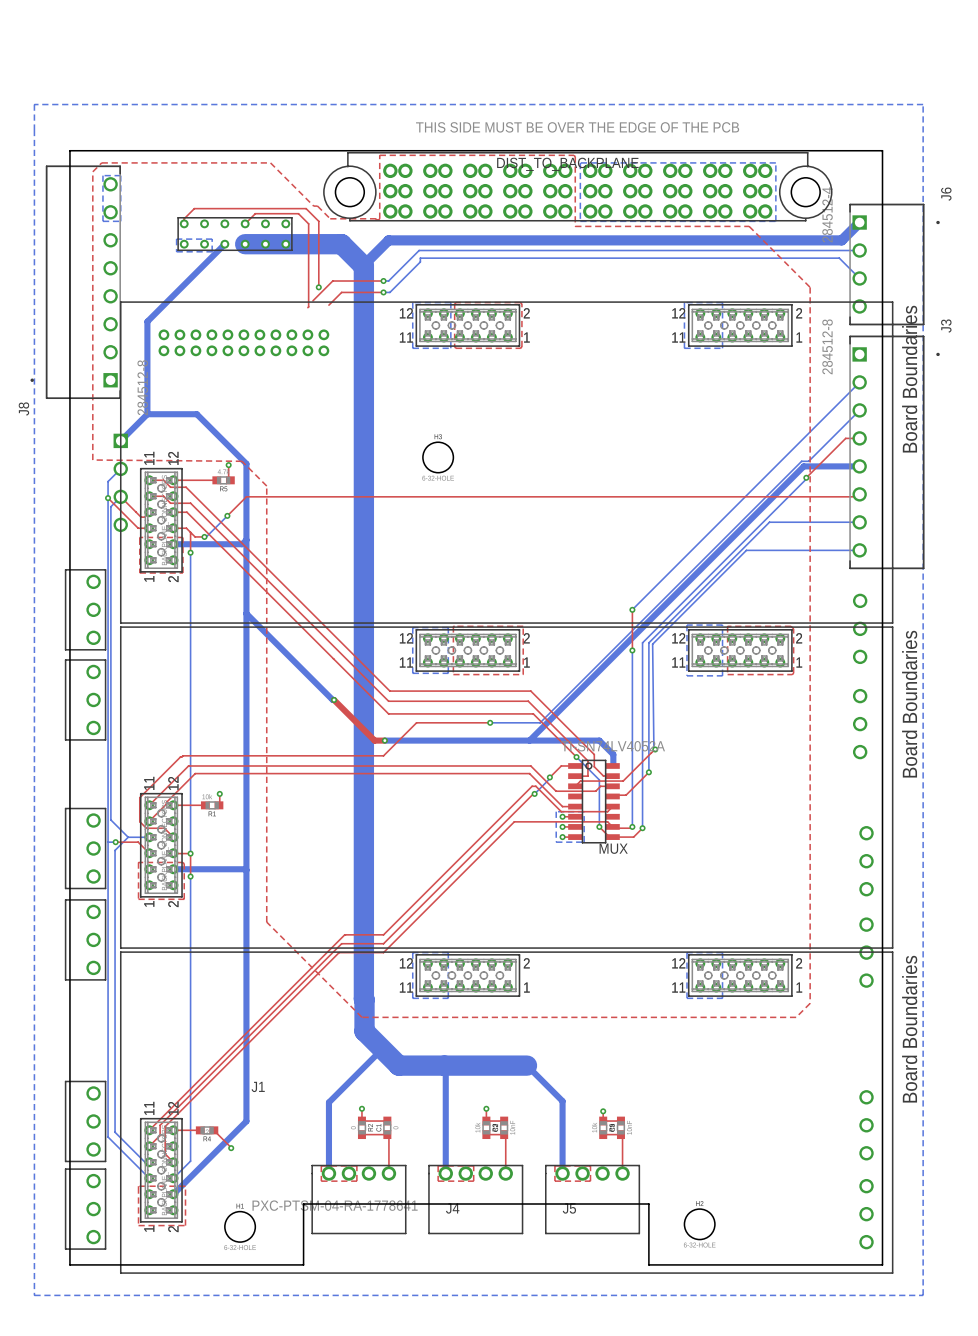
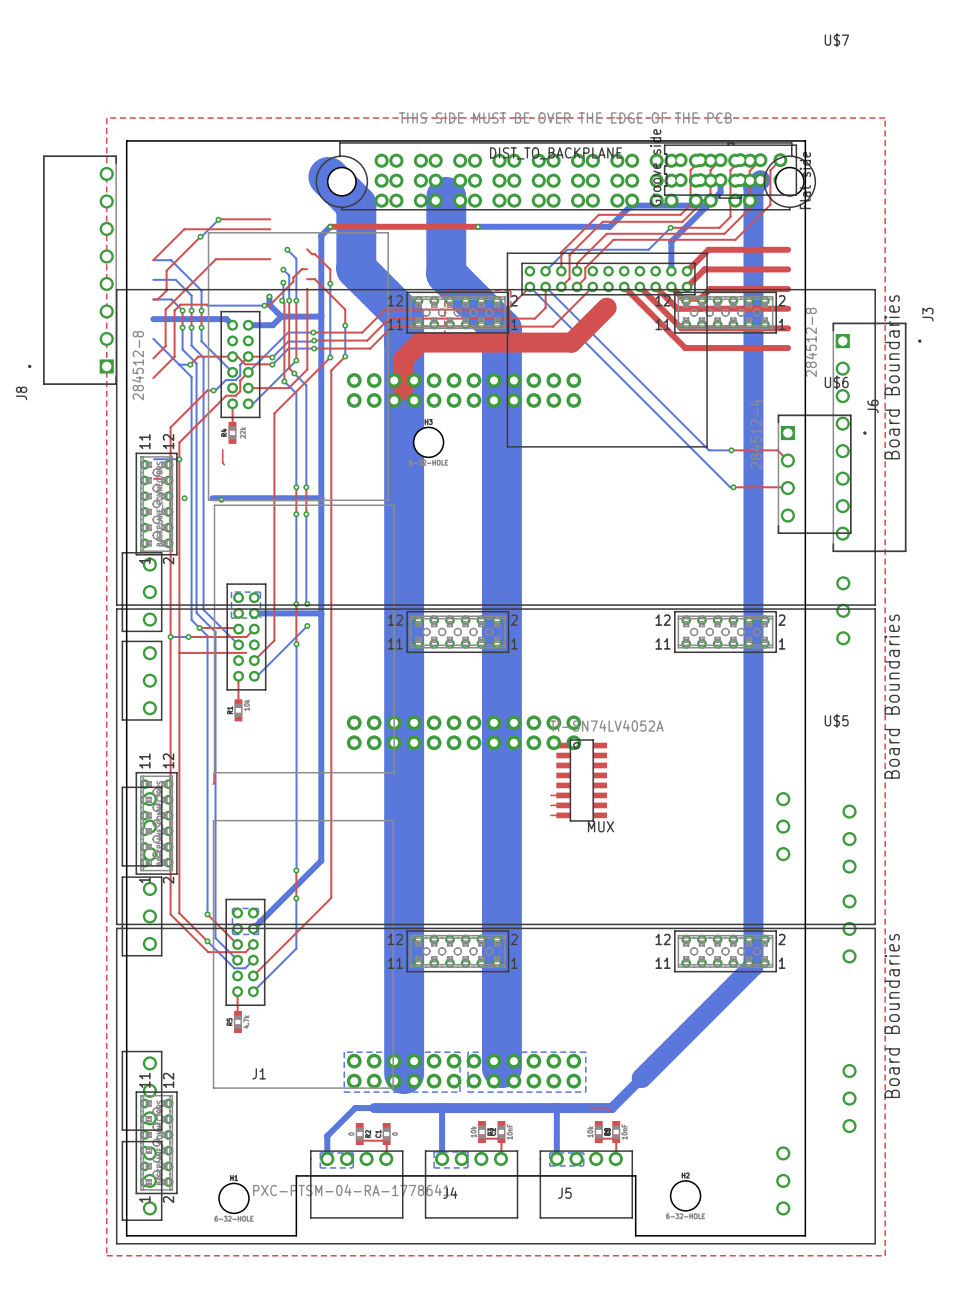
bottom zone outline: (34, 104) (34, 1295) (923, 1295) (923, 104) (34, 104) -> none
board edge: (130, 150) (69, 150) (69, 1264) (130, 1264) -> (126, 140) (126, 1235)
board edge: (821, 150) (882, 150) (882, 1264) (821, 1264) -> (805, 140) (805, 1235)
top zone outline: (379, 155) (378, 220) (330, 218) (317, 206) (313, 206) (270, 162) (101, 162) (92, 171) (92, 460) (242, 461) (266, 486) (266, 922) (361, 1017) (796, 1017) (810, 1003) (810, 287) (749, 226) (575, 226) (573, 155) (379, 155) -> (106, 118) (106, 1255) (885, 1255) (885, 118) (106, 118)
bottom zone outline: (580, 162) (580, 221) (775, 221) (775, 162) (580, 162) -> none
top track: none -> (700, 160) (690, 170) (690, 204) (680, 214) (598, 214) (561, 252) (561, 271)
top track: none -> (720, 160) (710, 170) (710, 193) (682, 221) (602, 221) (569, 254) (569, 278) (561, 286)
top track: none -> (740, 160) (730, 170) (730, 216) (719, 227) (670, 227)
top track: none -> (760, 160) (749, 170) (749, 208) (724, 233) (606, 233) (576, 263) (577, 271)
top track: none -> (780, 160) (770, 170) (770, 204) (735, 239) (613, 239) (585, 268) (585, 278) (577, 286)
bottom zone outline: (102, 175) (102, 221) (120, 221) (120, 175) (102, 175) -> none
part: none -> (730, 170)
bottom track: none -> (328, 176) (356, 204) (356, 268) (404, 316) (404, 1074)
bottom track: none -> (720, 180) (720, 192) (671, 241) (671, 271)
bottom track: none -> (760, 180) (753, 187) (753, 966) (611, 1108) (355, 1108) (327, 1136) (327, 1158)
bottom track: none -> (446, 196) (446, 273) (501, 329) (501, 1068)
bottom track: none -> (707, 205) (630, 205) (609, 226) (477, 226)
bottom track: (859, 222) (841, 240) (388, 240) (363, 265) (341, 244) (245, 244) -> none
top track: (184, 223) (184, 218) (194, 208) (306, 208) (318, 221) (318, 287) -> none
top track: (245, 223) (255, 213) (298, 213) (308, 223) (307, 307) -> none
bottom track: none -> (218, 219) (200, 236)
via: none -> (218, 219)
top track: none -> (270, 219) (218, 219)
part: (235, 234) -> none
top track: none -> (330, 226) (477, 226)
bottom track: none -> (330, 226) (321, 235) (321, 860) (253, 928)
via: none -> (330, 226)
via: none -> (477, 226)
bottom zone outline: (176, 239) (176, 251) (212, 251) (212, 239) (176, 239) -> none
bottom track: none -> (670, 227) (648, 249) (567, 249) (545, 271)
via: none -> (670, 227)
top track: none -> (270, 229) (184, 229) (153, 260)
bottom track: (224, 244) (147, 321) (147, 414) -> none
top track: none -> (200, 236) (166, 270) (166, 290) (157, 299) (153, 299)
via: none -> (200, 236)
bottom track: (859, 250) (419, 250) (388, 281) (383, 281) -> none
top track: none -> (307, 249) (330, 269) (330, 283)
bottom track: none -> (287, 249) (296, 258) (296, 300)
via: none -> (287, 249)
top track: none -> (788, 249) (708, 249) (687, 271)
J6 position: (894, 264) -> (822, 474)
bottom track: (363, 265) (364, 1031) (398, 1065) (527, 1065) (562, 1101) (562, 1173) -> none
top track: none -> (270, 259) (216, 259) (165, 309) (165, 346) (153, 358)
bottom track: none -> (153, 260) (171, 260) (201, 290) (201, 310)
bottom track: (859, 278) (839, 258) (420, 258) (420, 261) (389, 292) (383, 292) -> none
bottom track: none -> (283, 269) (289, 275) (289, 300)
via: none -> (283, 269)
top track: none -> (307, 269) (301, 269) (293, 277) (293, 281) (269, 305) (264, 305)
top track: (383, 281) (332, 281) (312, 300) -> none
via: (383, 281) -> none
top track: none -> (788, 269) (704, 269) (687, 286)
via: (318, 287) -> none
top track: none -> (307, 279) (314, 279) (345, 309) (345, 325)
bottom track: none -> (153, 279) (175, 279) (191, 295) (191, 310)
top track: (383, 292) (341, 292) (328, 305) -> none
via: (383, 292) -> none
bottom track: none -> (283, 282) (282, 300)
via: none -> (283, 282)
bottom track: none -> (330, 283) (330, 357)
via: none -> (330, 283)
top track: none -> (529, 286) (507, 309) (385, 309) (362, 332) (313, 332)
bottom track: none -> (529, 286) (730, 487) (733, 487)
top track: none -> (545, 286) (545, 307) (534, 318) (389, 318) (367, 340) (314, 340)
bottom track: none -> (545, 286) (709, 450) (731, 450)
top track: none -> (592, 286) (553, 326) (392, 326) (370, 348) (314, 348)
top track: none -> (624, 286) (685, 348) (788, 348)
top track: none -> (639, 286) (681, 328) (788, 328)
top track: none -> (655, 286) (677, 308) (700, 308)
top track: none -> (671, 286) (683, 298) (700, 298) (710, 289) (788, 289)
top track: none -> (307, 289) (307, 369) (288, 388) (248, 388)
bottom zone outline: (412, 302) (412, 348) (450, 348) (450, 302) (412, 302) -> none
bottom zone outline: (684, 302) (722, 302) (722, 348) (684, 348) (684, 302) -> none
bottom track: none -> (269, 296) (269, 304) (281, 316)
via: none -> (269, 296)
bottom track: none -> (153, 299) (171, 299) (182, 310)
top track: none -> (282, 300) (284, 303) (284, 381)
via: none -> (282, 300)
top track: none -> (289, 300) (289, 368) (294, 373)
via: none -> (289, 300)
top track: none -> (296, 300) (296, 360)
via: none -> (296, 300)
top track: none -> (207, 305) (180, 304) (174, 310) (174, 356) (153, 378)
bottom track: none -> (207, 305) (264, 305)
via: none -> (264, 305)
top track: none -> (606, 307) (571, 342) (420, 342) (403, 359) (403, 390)
top track: none -> (700, 308) (788, 308)
top track: none -> (182, 310) (182, 327)
via: none -> (182, 310)
top track: none -> (191, 310) (191, 327)
via: none -> (191, 310)
top track: none -> (201, 310) (201, 327)
via: none -> (201, 310)
bottom track: none -> (281, 316) (321, 316)
bottom track: none -> (281, 316) (272, 325) (248, 325)
bottom track: none -> (153, 319) (226, 319) (232, 325)
bottom track: none -> (345, 325) (345, 356)
via: none -> (345, 325)
bottom track: none -> (182, 327) (182, 349) (196, 363) (196, 613) (215, 631) (215, 938) (237, 960)
via: none -> (182, 327)
bottom track: none -> (191, 327) (191, 345) (203, 357) (203, 609) (238, 644)
via: none -> (191, 327)
bottom track: none -> (201, 327) (201, 341) (232, 372)
via: none -> (201, 327)
part: (243, 342) -> none
bottom track: none -> (313, 332) (288, 332) (248, 372)
via: none -> (313, 332)
bottom track: none -> (153, 338) (191, 377) (191, 620) (207, 635) (207, 914)
bottom track: none -> (314, 340) (288, 341) (272, 357)
via: none -> (314, 340)
bottom track: none -> (314, 348) (288, 348) (272, 364)
via: none -> (314, 348)
part: none -> (607, 350)
top track: none -> (248, 356) (272, 357)
bottom track: none -> (248, 356) (240, 364) (240, 375) (235, 380) (225, 380) (213, 390)
top track: none -> (345, 356) (331, 370) (331, 897) (253, 975)
via: none -> (345, 356)
via: none -> (272, 357)
top track: none -> (330, 357) (274, 413) (274, 640) (254, 660)
via: none -> (330, 357)
bottom track: none -> (296, 360) (253, 403) (248, 403)
via: none -> (296, 360)
bottom track: none -> (179, 364) (190, 364)
top track: none -> (190, 364) (198, 356) (237, 356) (245, 364) (272, 364)
via: none -> (190, 364)
via: none -> (272, 364)
part: none -> (298, 366)
bottom track: (859, 382) (632, 609) -> none
top track: none -> (248, 372) (240, 380) (240, 391) (235, 395) (226, 395) (179, 442) (179, 913) (207, 941)
bottom track: none -> (294, 373) (306, 385) (306, 487)
via: none -> (294, 373)
bottom track: none -> (284, 381) (296, 393) (296, 487)
via: none -> (284, 381)
top track: none -> (213, 390) (207, 390) (170, 427) (170, 914) (208, 952) (245, 952) (253, 944)
via: none -> (213, 390)
U$7: none -> (464, 390)
bottom track: (859, 410) (808, 461) (801, 461) (540, 722) (490, 722) -> none
bottom track: (147, 414) (120, 440) -> none
bottom track: (147, 414) (196, 414) (246, 463) (246, 1121) (173, 1194) -> none
top track: none -> (232, 403) (232, 426)
top track: (859, 438) (845, 438) (806, 477) -> none
via: (228, 465) -> none
top track: none -> (731, 450) (777, 450) (787, 460)
via: none -> (731, 450)
bottom track: (859, 466) (803, 466) (529, 740) -> none
bottom track: (120, 468) (108, 481) (108, 1137) (149, 1178) -> none
bottom track: none -> (154, 459) (179, 459)
via: none -> (179, 459)
bottom track: (806, 477) (642, 642) (642, 828) -> none
via: (806, 477) -> none
top track: (149, 480) (163, 480) (170, 487) (186, 487) (389, 691) (530, 691) (594, 754) (594, 766) (603, 775) (612, 776) -> none
top track: (173, 480) (216, 480) -> none
part rotation: 0° (223, 480) -> 90° clockwise (237, 1021)
part position: (223, 480) -> (237, 1021)
part: (120, 482) -> none
top track: none -> (154, 478) (170, 479)
top track: (859, 494) (857, 496) (246, 496) (227, 515) -> none
top track: (120, 496) (141, 517) (144, 517) (149, 512) -> none
bottom track: (120, 496) (110, 506) (110, 819) (128, 837) -> none
top track: (149, 496) (163, 496) (170, 503) (190, 503) (388, 701) (528, 701) (587, 760) (587, 776) (575, 776) -> none
top track: (108, 498) (138, 528) (149, 527) -> none
via: (108, 498) -> none
top track: none -> (296, 487) (296, 514)
via: none -> (296, 487)
top track: none -> (306, 487) (306, 514)
via: none -> (306, 487)
top track: none -> (733, 487) (787, 488)
via: none -> (733, 487)
top track: (173, 512) (186, 512) (388, 713) (533, 713) (576, 757) -> none
via: none -> (184, 498)
bottom track: none -> (212, 498) (321, 498)
bottom track: (227, 515) (204, 536) -> none
bottom track: (859, 522) (769, 522) (648, 642) (648, 772) -> none
top track: (173, 528) (186, 528) (195, 536) (204, 536) -> none
bottom track: none -> (296, 514) (296, 604)
via: none -> (296, 514)
bottom track: none -> (306, 514) (307, 604)
via: none -> (306, 514)
top track: (190, 532) (190, 552) -> none
via: (204, 536) -> none
top zone outline: (139, 537) (139, 573) (182, 573) (182, 537) (139, 537) -> none
bottom track: (246, 540) (242, 544) (173, 544) -> none
bottom track: (859, 550) (746, 550) (652, 644) (655, 749) -> none
bottom track: (190, 552) (190, 853) -> none
via: (190, 552) -> none
part: (85, 609) -> none
part: none -> (142, 592)
bottom zone outline: none -> (231, 592) (231, 618) (260, 618) (260, 592) (231, 592)
top track: (632, 609) (632, 650) -> none
via: (632, 609) -> none
bottom track: (246, 613) (334, 699) -> none
top track: none -> (296, 604) (296, 644)
via: none -> (296, 604)
via: none -> (307, 604)
bottom zone outline: (686, 625) (686, 675) (722, 675) (722, 625) (686, 625) -> none
top zone outline: (453, 626) (453, 674) (523, 674) (523, 626) (453, 626) -> none
top zone outline: (727, 626) (791, 626) (793, 628) (793, 673) (727, 674) (727, 626) -> none
bottom zone outline: (412, 627) (412, 673) (448, 673) (448, 627) (412, 627) -> none
bottom track: none -> (254, 613) (321, 614)
bottom track: none -> (307, 626) (257, 676) (254, 676)
via: none -> (307, 626)
top track: none -> (199, 628) (238, 629)
via: none -> (199, 628)
top track: none -> (254, 629) (246, 636) (188, 636)
bottom track: (632, 650) (632, 826) -> none
via: (632, 650) -> none
bottom track: none -> (170, 636) (188, 636)
via: none -> (170, 636)
via: none -> (188, 636)
part: none -> (304, 638)
bottom track: none -> (296, 644) (296, 870)
via: none -> (296, 644)
top track: none -> (179, 652) (246, 652)
top track: none -> (238, 676) (238, 703)
part: (85, 699) -> none
top track: (334, 699) (374, 740) (384, 740) -> none
via: (334, 699) -> none
part: none -> (142, 680)
top track: (490, 722) (416, 722) (383, 755) (182, 755) (139, 797) (139, 821) (146, 828) (164, 828) (173, 837) -> none
via: (490, 722) -> none
part position: (860, 724) -> (783, 826)
bottom track: (384, 740) (599, 740) (613, 754) (613, 764) -> none
via: (384, 740) -> none
top track: (655, 749) (623, 781) (580, 781) (575, 786) -> none
via: (655, 749) -> none
U$6: none -> (464, 732)
bottom track: (576, 757) (599, 779) (599, 826) -> none
via: (576, 757) -> none
top track: (575, 765) (561, 765) (549, 777) -> none
top track: (648, 772) (626, 795) (612, 796) -> none
via: (648, 772) -> none
bottom track: (549, 777) (534, 793) -> none
via: (549, 777) -> none
top track: (612, 786) (600, 786) (595, 791) (556, 791) (530, 765) (188, 765) (149, 805) -> none
via: (219, 793) -> none
top track: (534, 793) (383, 943) (341, 943) (160, 1125) (160, 1135) (149, 1146) -> none
via: (534, 793) -> none
top track: (173, 805) (205, 805) -> none
part rotation: 0° (212, 805) -> 90° clockwise (238, 710)
part position: (212, 805) -> (238, 710)
top track: (575, 806) (562, 806) (529, 773) (195, 773) (149, 821) -> none
top track: (612, 806) (607, 811) (561, 811) (535, 786) (532, 786) (383, 934) (344, 934) (149, 1130) -> none
bottom zone outline: (556, 811) (556, 842) (584, 842) (584, 811) (556, 811) -> none
via: (562, 816) -> none
via: (562, 826) -> none
top track: (599, 826) (609, 837) (633, 837) (642, 828) -> none
via: (599, 826) -> none
top track: (632, 826) (613, 828) (607, 821) (514, 821) (383, 952) (339, 952) (165, 1126) (165, 1154) (173, 1162) -> none
via: (632, 826) -> none
via: (642, 828) -> none
bottom track: (128, 837) (115, 850) (115, 1132) (145, 1162) (149, 1162) -> none
bottom track: (149, 837) (128, 837) -> none
via: (562, 837) -> none
bottom track: (108, 842) (115, 842) -> none
top track: (115, 842) (138, 842) (149, 853) -> none
via: (115, 842) -> none
part: (85, 848) -> none
part: none -> (142, 826)
top track: (173, 853) (190, 853) (190, 876) -> none
via: (190, 853) -> none
top zone outline: (138, 862) (138, 899) (184, 899) (182, 862) (138, 862) -> none
bottom track: (173, 869) (246, 870) -> none
bottom track: (190, 876) (190, 1161) (173, 1178) -> none
via: (190, 876) -> none
top track: none -> (296, 870) (296, 898)
via: none -> (296, 870)
bottom track: none -> (296, 898) (296, 948) (253, 991)
via: none -> (296, 898)
bottom zone outline: none -> (232, 908) (233, 934) (258, 934) (258, 908) (232, 908)
top track: none -> (207, 914) (237, 944)
via: none -> (207, 914)
part: (85, 939) -> none
part: none -> (142, 916)
bottom zone outline: (412, 952) (412, 998) (448, 998) (448, 952) (412, 952) -> none
bottom zone outline: (686, 952) (686, 998) (722, 998) (722, 952) (686, 952) -> none
bottom track: none -> (207, 941) (234, 968) (245, 968) (253, 960)
via: none -> (207, 941)
part: none -> (303, 954)
top track: none -> (237, 991) (237, 1015)
bottom track: (375, 1055) (328, 1102) (328, 1173) -> none
bottom track: (444, 1065) (445, 1173) -> none
bottom zone outline: none -> (344, 1052) (344, 1092) (460, 1092) (460, 1052) (344, 1052)
bottom zone outline: none -> (468, 1052) (468, 1092) (585, 1092) (585, 1052) (468, 1052)
U$5: none -> (464, 1071)
top track: (361, 1108) (361, 1121) (387, 1121) -> none
via: (361, 1108) -> none
top track: (486, 1108) (486, 1121) (504, 1121) -> none
via: (486, 1108) -> none
top track: (603, 1111) (603, 1121) (620, 1121) -> none
via: (603, 1111) -> none
part: none -> (142, 1090)
part: (85, 1121) -> none
part position: (361, 1127) -> (359, 1134)
part position: (387, 1127) -> (386, 1134)
part position: (486, 1127) -> (481, 1132)
part position: (504, 1127) -> (501, 1132)
part position: (603, 1127) -> (598, 1132)
part position: (620, 1127) -> (616, 1132)
top track: (173, 1130) (200, 1130) -> none
part rotation: 0° (207, 1130) -> 90° clockwise (232, 432)
part position: (207, 1130) -> (232, 432)
top track: (213, 1130) (231, 1148) -> none
top track: (361, 1134) (388, 1136) (388, 1173) -> none
bottom track: none -> (442, 1108) (442, 1158)
top track: (486, 1134) (505, 1136) (505, 1173) -> none
bottom track: none -> (554, 1108) (556, 1110) (556, 1158)
top track: (620, 1134) (622, 1136) (622, 1173) -> none
via: (231, 1148) -> none
top zone outline: (321, 1165) (321, 1181) (356, 1181) (356, 1165) (321, 1165) -> none
top zone outline: (438, 1165) (473, 1165) (473, 1181) (438, 1181) (438, 1165) -> none
top zone outline: (554, 1165) (590, 1165) (590, 1181) (554, 1181) (554, 1165) -> none
top track: none -> (481, 1138) (501, 1138) (501, 1158)
top track: none -> (598, 1138) (616, 1138) (615, 1158)
top track: none -> (359, 1140) (386, 1140) (386, 1158)
bottom zone outline: none -> (434, 1151) (434, 1167) (468, 1166) (468, 1151) (434, 1151)
bottom zone outline: none -> (320, 1152) (320, 1167) (353, 1166) (353, 1152) (320, 1152)
bottom zone outline: none -> (549, 1152) (583, 1152) (583, 1164) (549, 1165) (549, 1152)
top zone outline: (138, 1186) (138, 1225) (185, 1225) (185, 1186) (138, 1186) -> none
J1 position: (358, 1199) -> (356, 1184)
J4 position: (475, 1199) -> (471, 1184)
J5 position: (592, 1199) -> (586, 1184)
part: (85, 1209) -> none
part: none -> (142, 1180)
part position: (866, 1214) -> (783, 1180)

